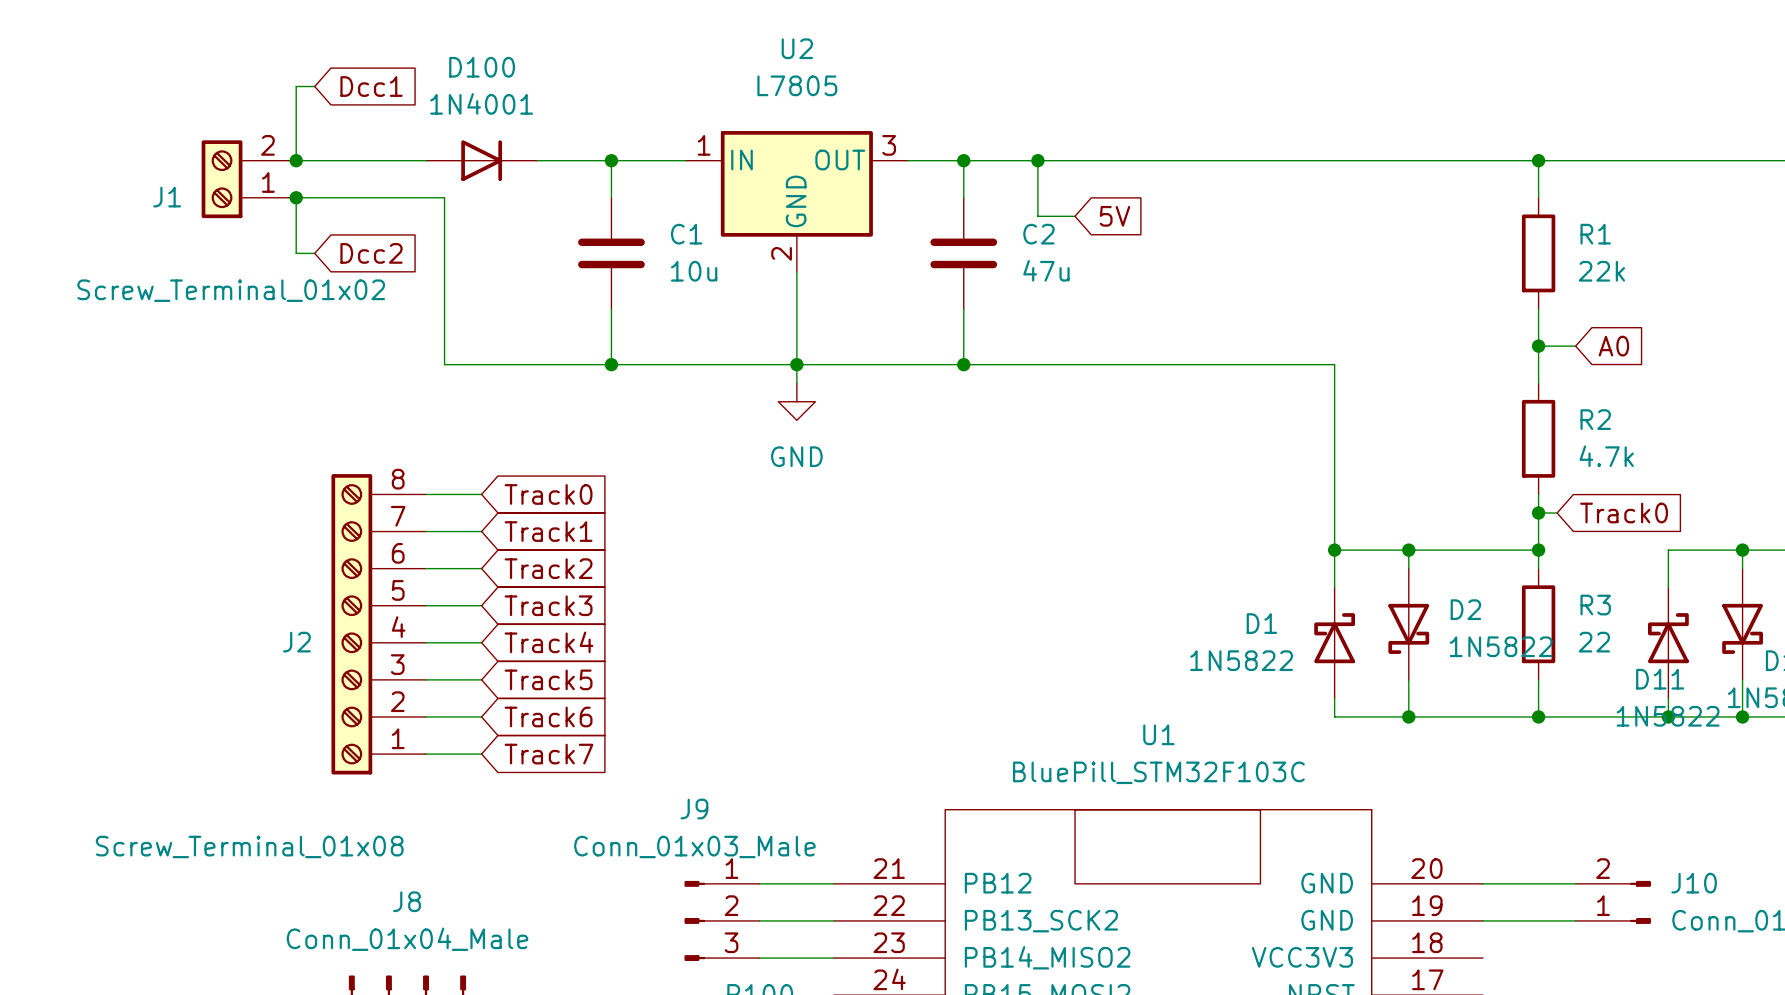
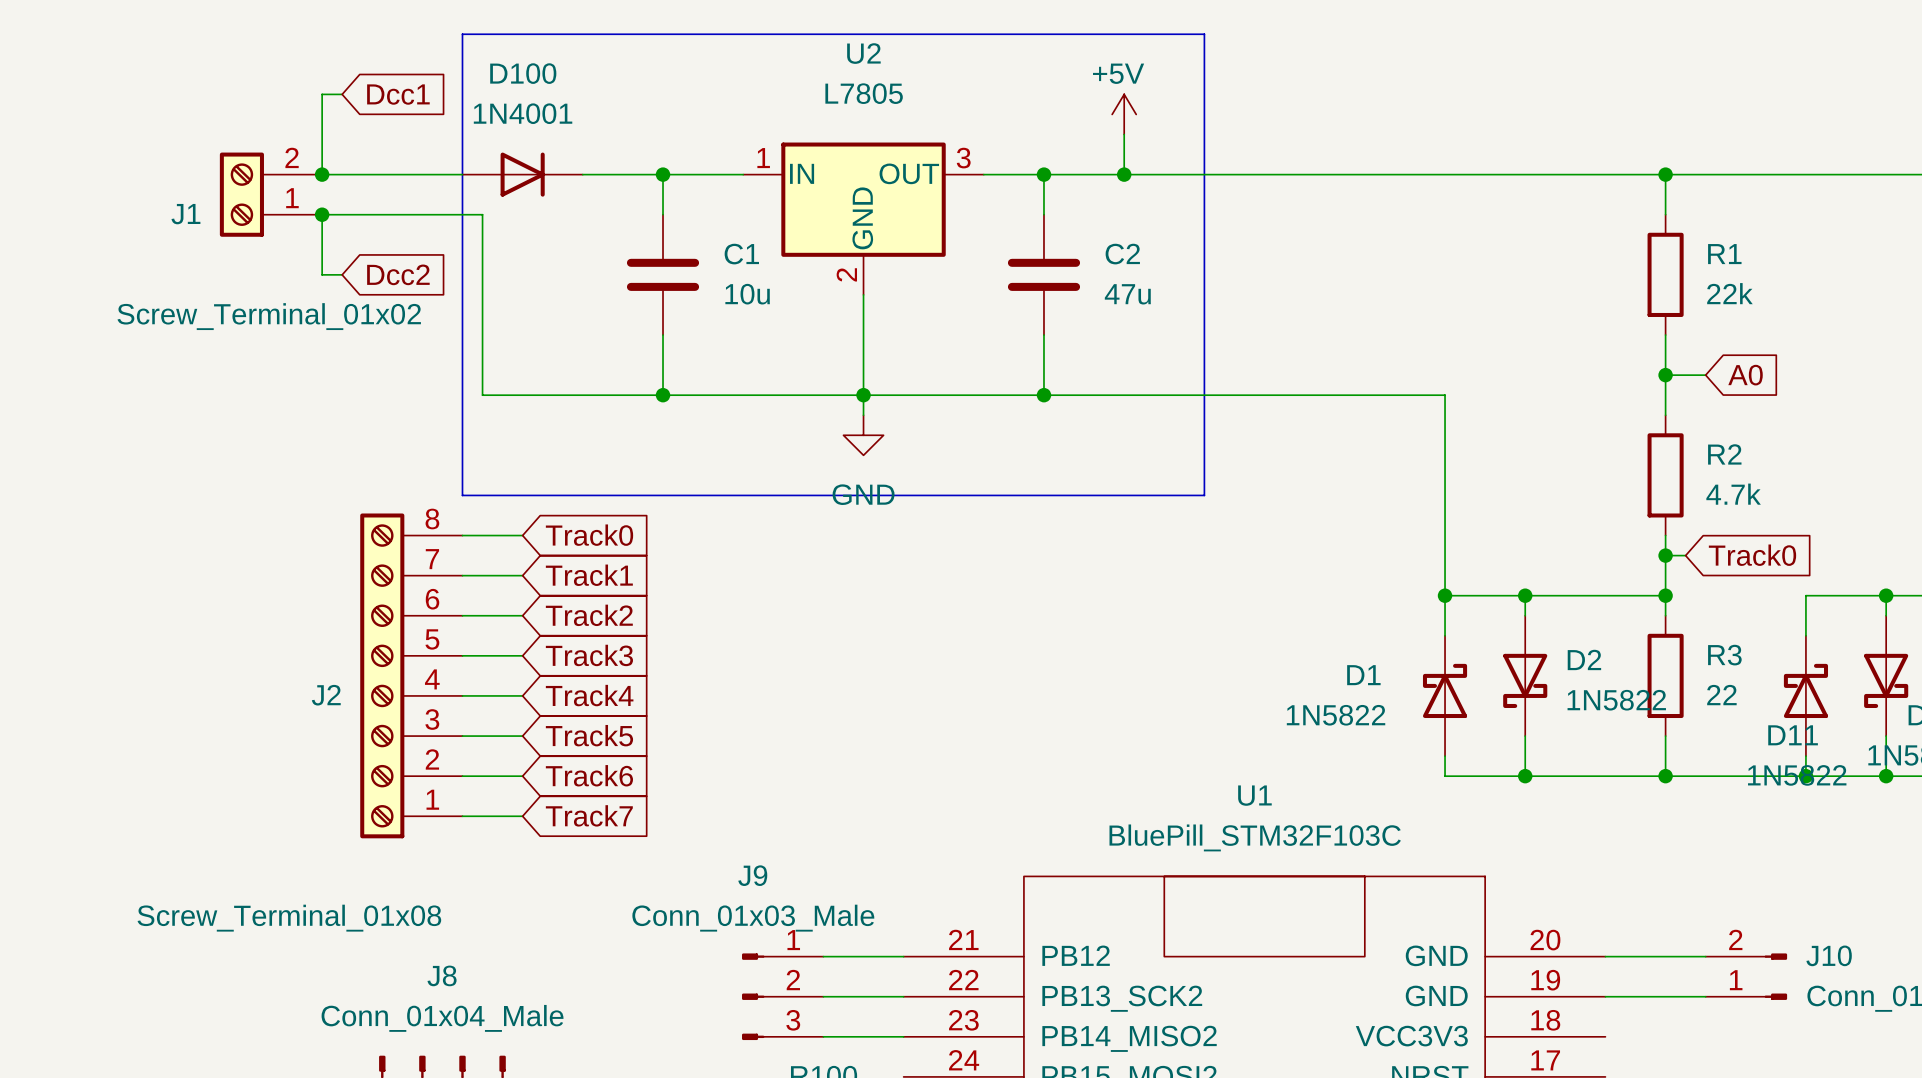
line: none -> (462, 34) (462, 495) (1204, 495) (1204, 34) (462, 34)
power symbol: none -> +5V (1124, 114)
wire: (1037, 160) (1037, 216) (1075, 216) -> (1124, 174) (1124, 134)
global label: 5V (1115, 216) -> none

